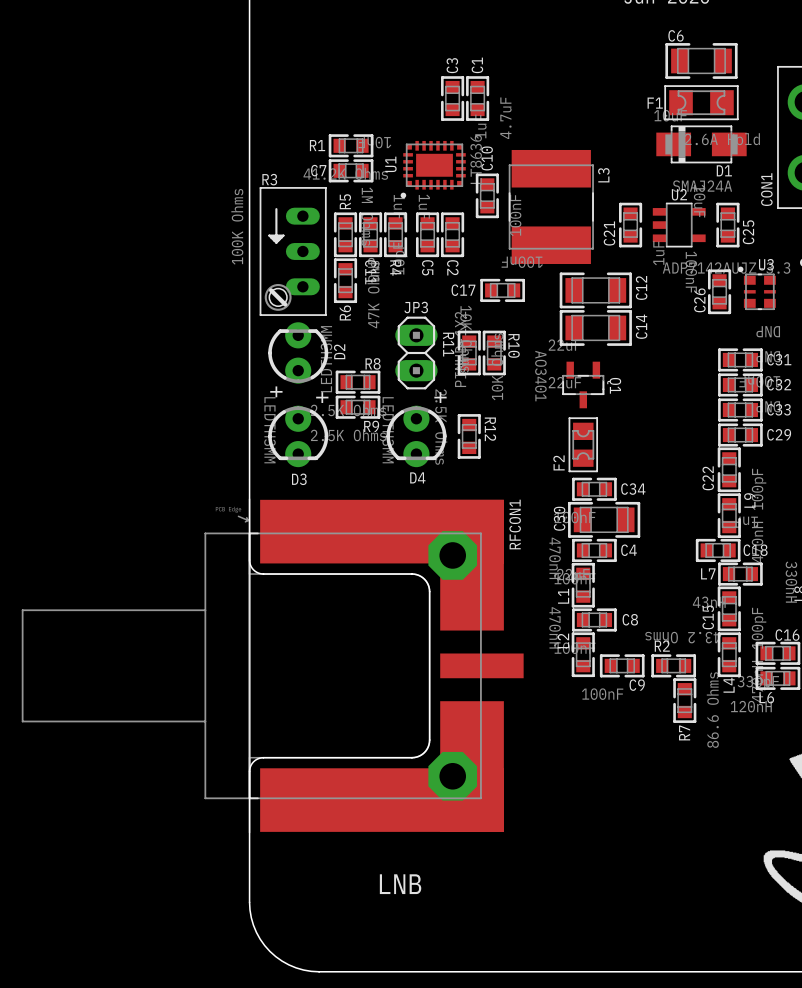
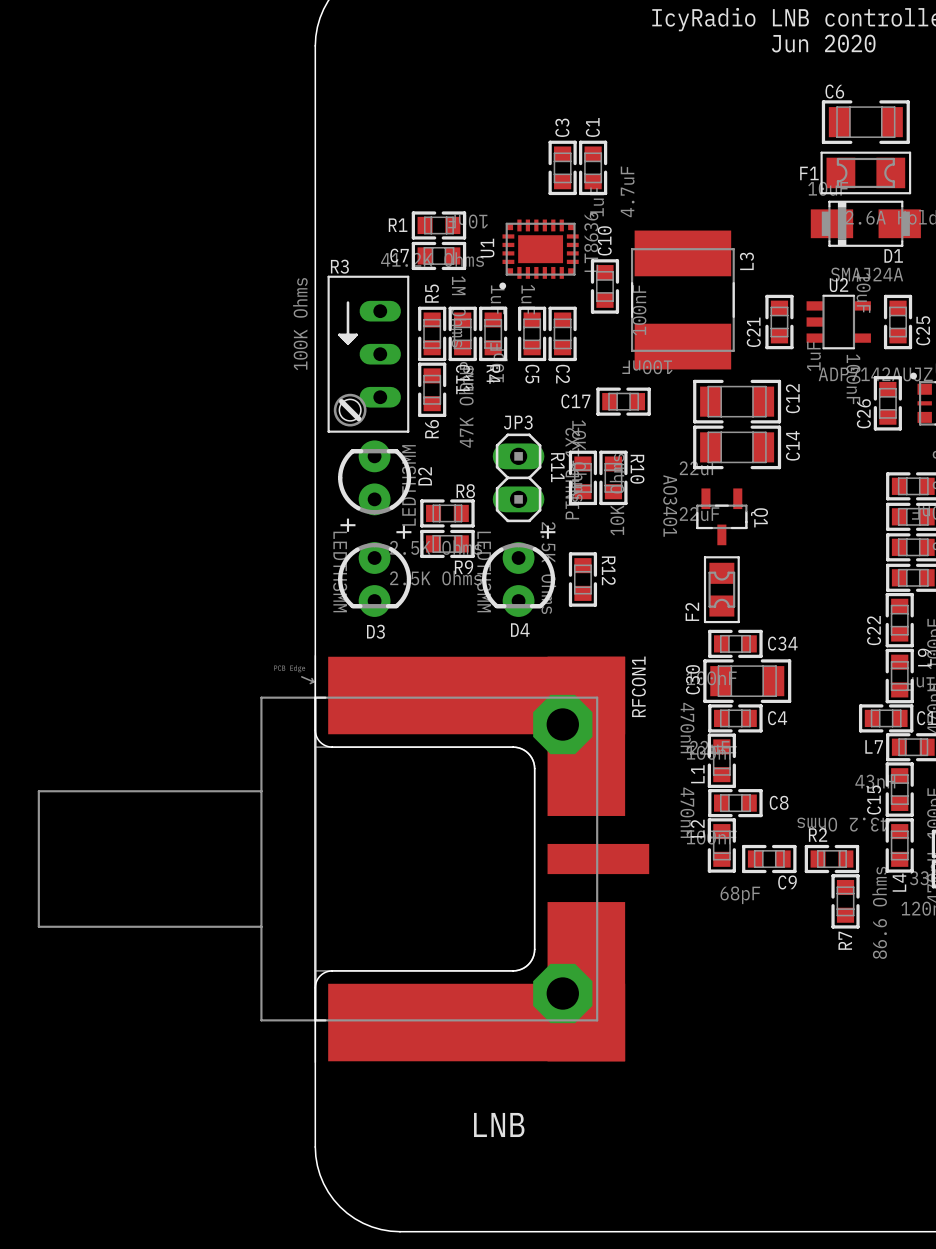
C9 value: 100nF (602, 694) -> 68pF (740, 895)

